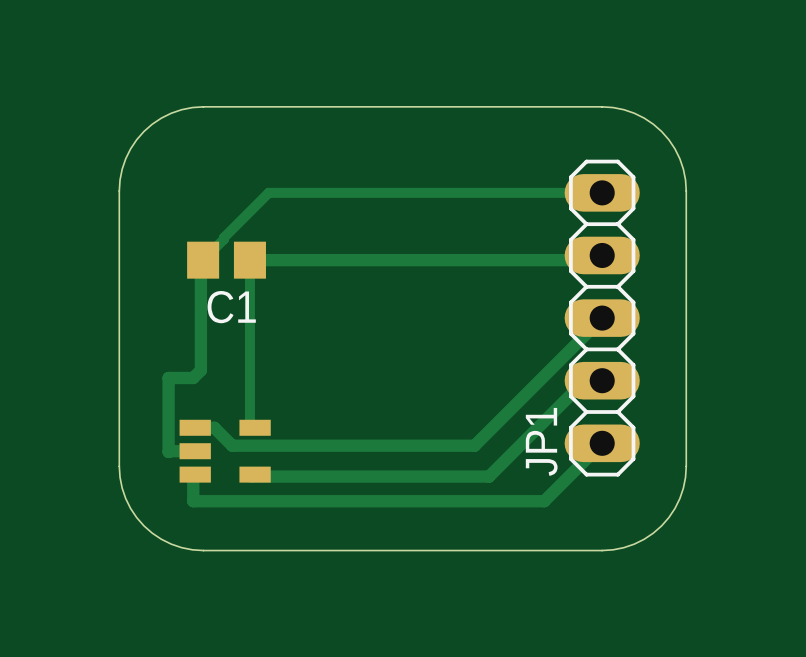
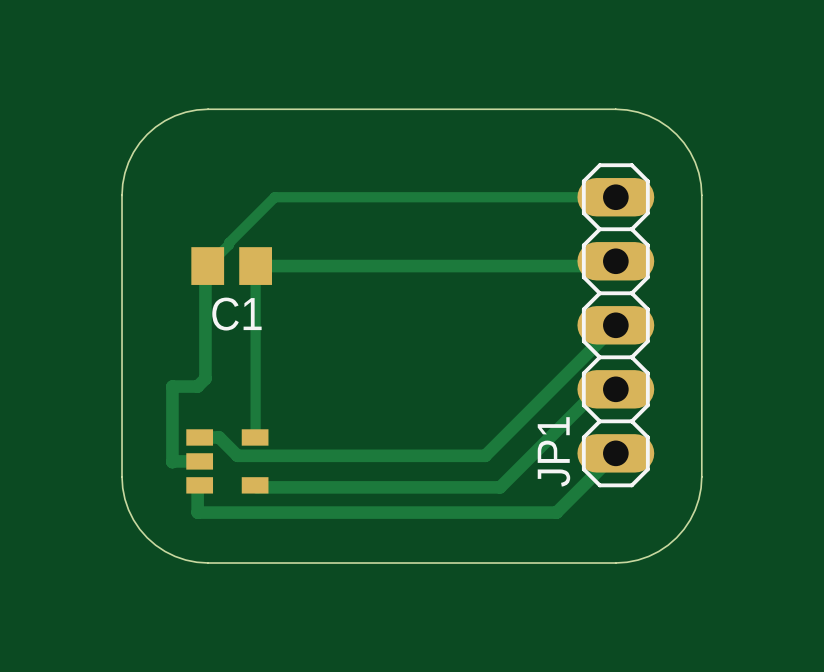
part footprint: [179, 419, 271, 483] -> [186, 429, 269, 494]

